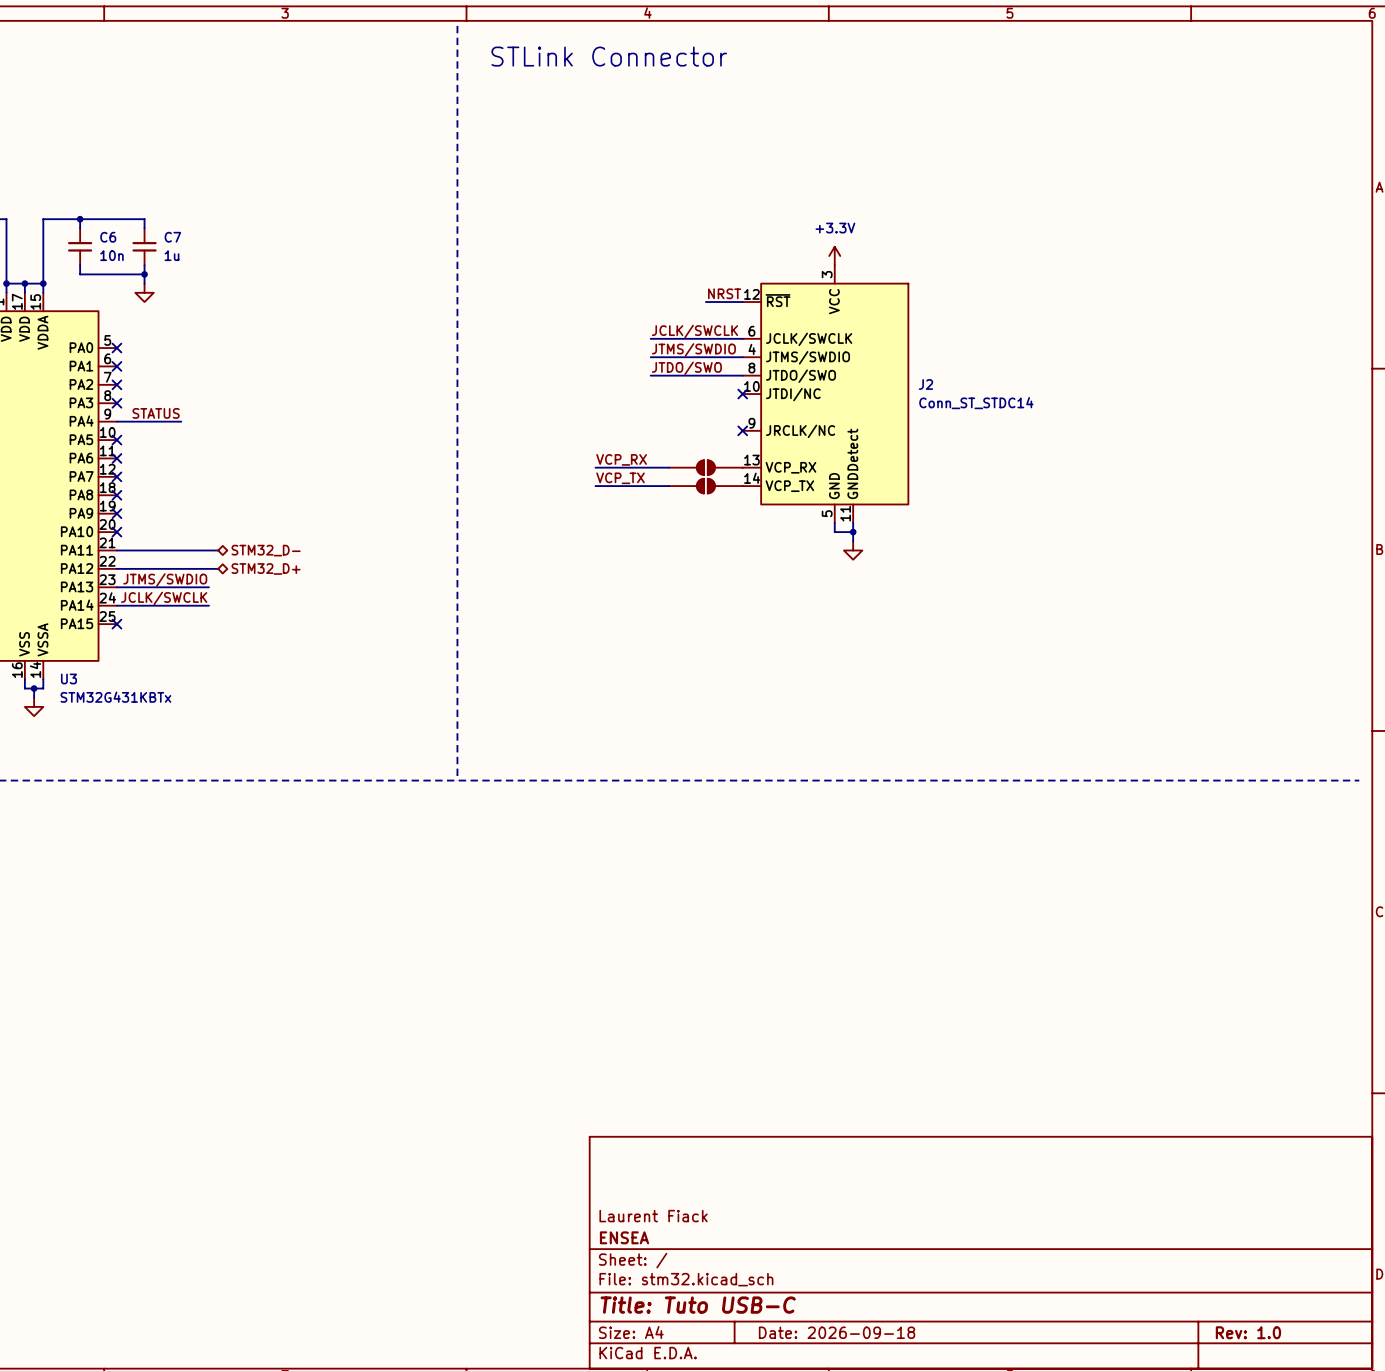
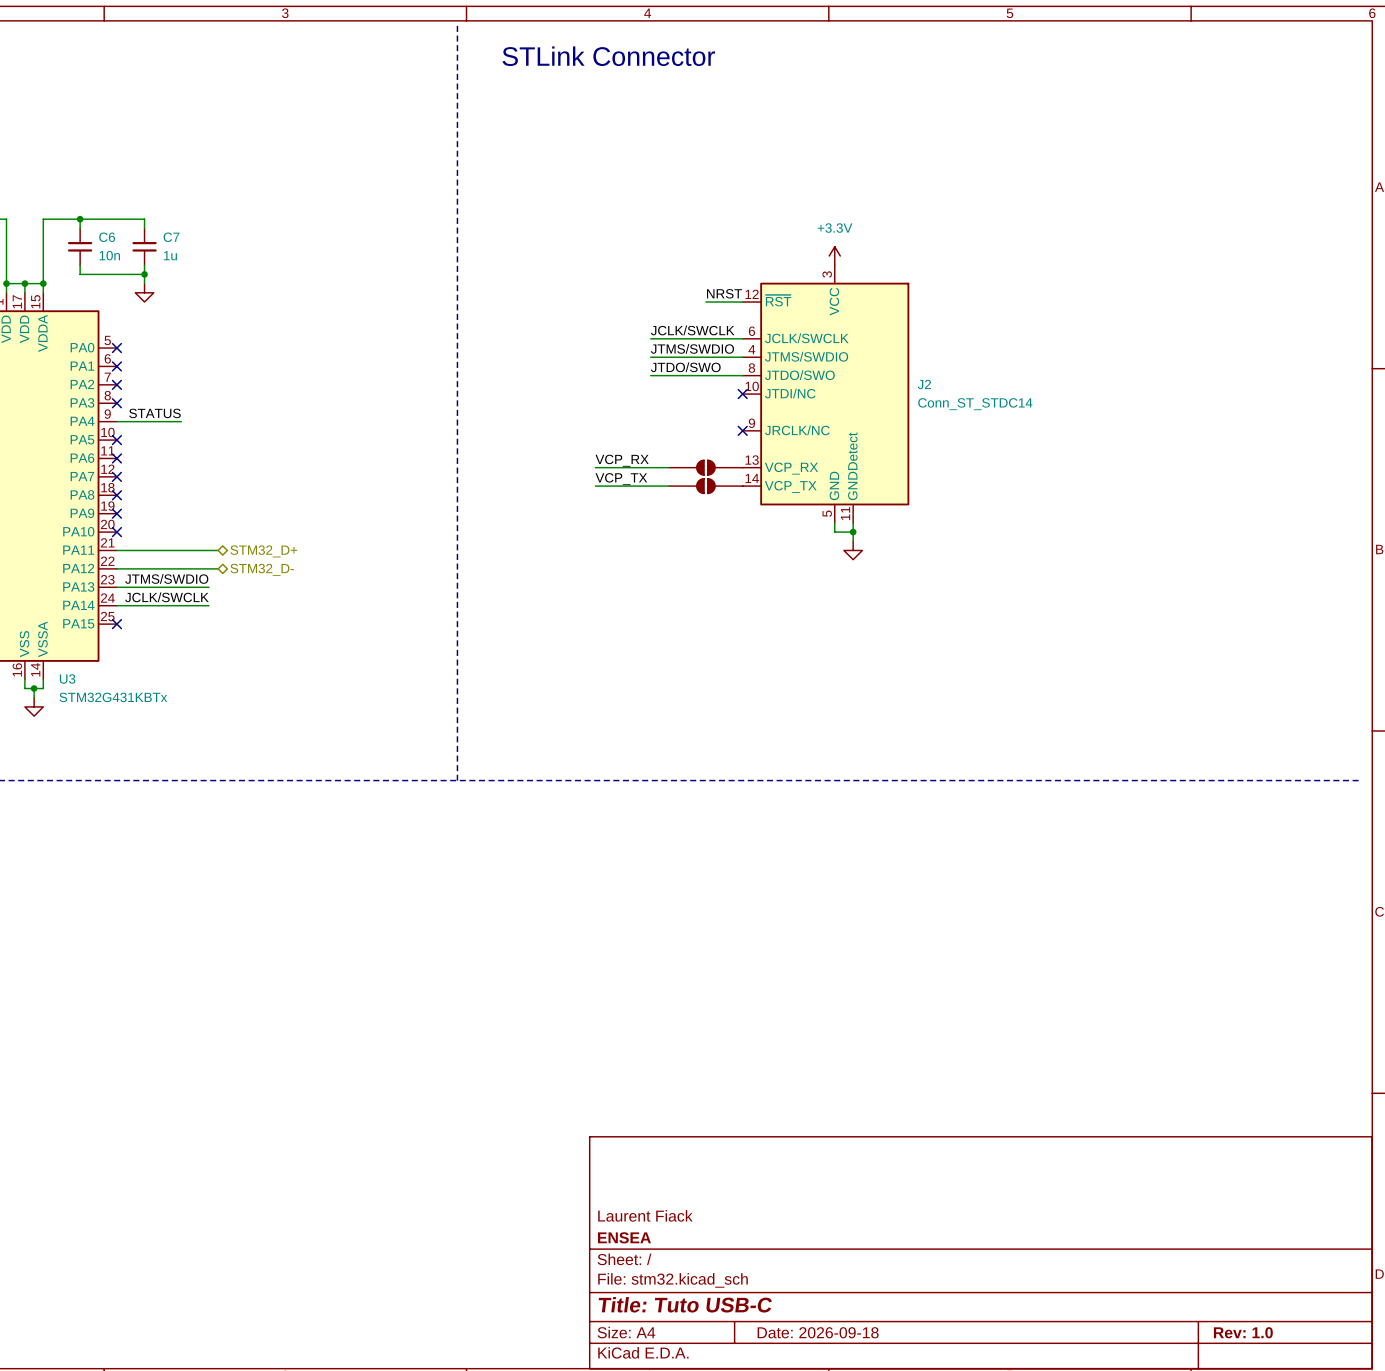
hierarchical label: STM32_D- (266, 550) -> STM32_D+ (263, 551)
hierarchical label: STM32_D+ (266, 568) -> STM32_D- (262, 569)

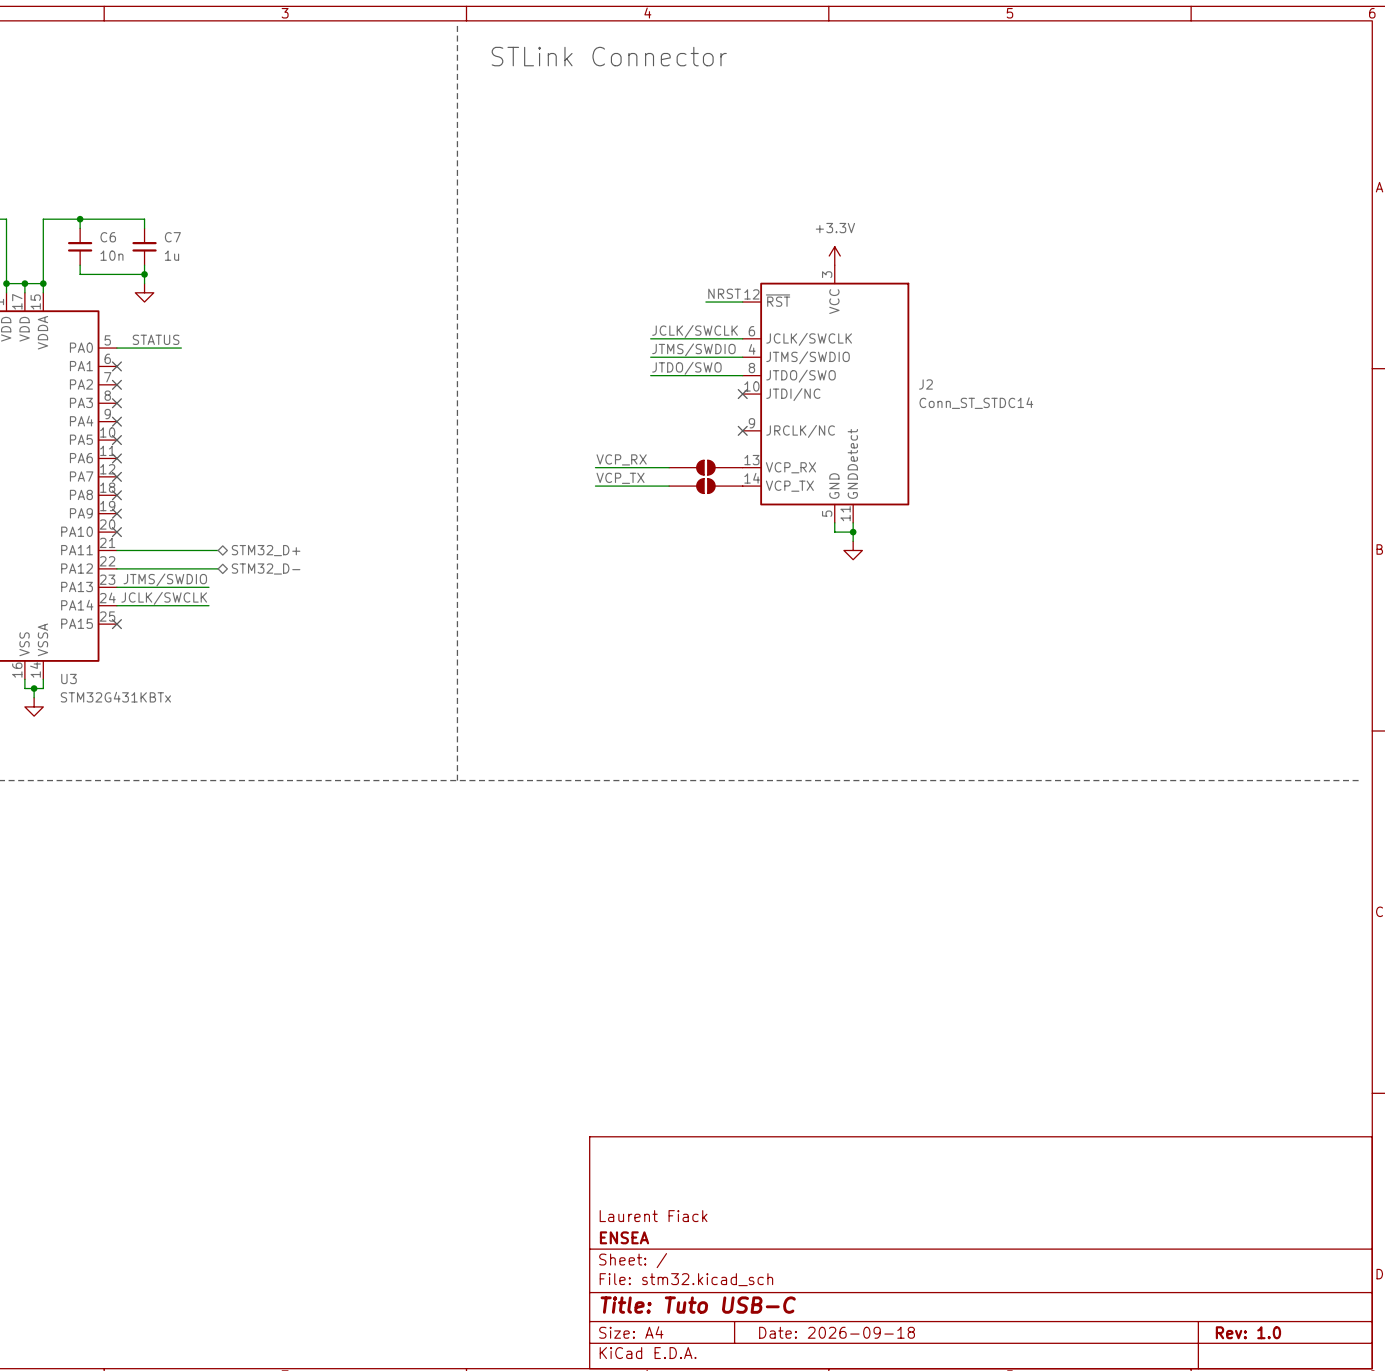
no-connect mark: (116, 348) -> none
label position: STATUS (154, 413) -> STATUS (156, 339)
wire: (116, 421) (181, 421) -> (116, 348) (181, 348)
no-connect mark: none -> (116, 421)

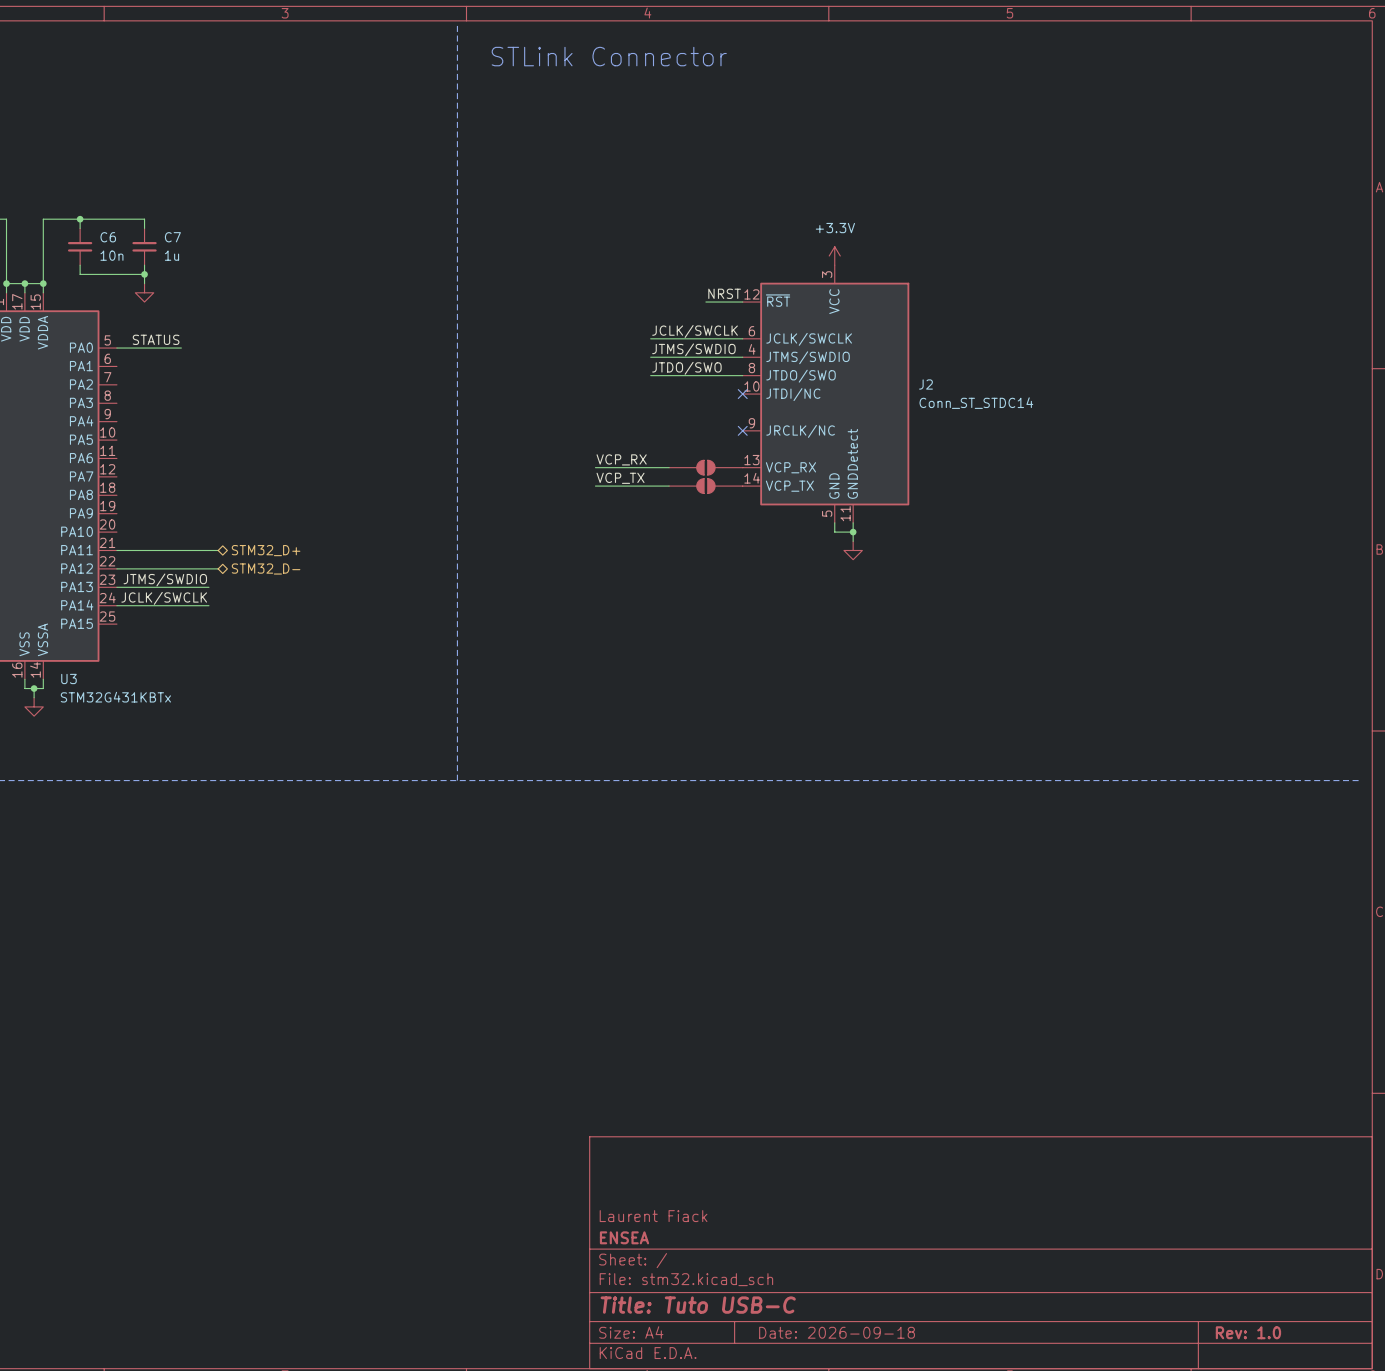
no-connect mark: (116, 366) -> none
no-connect mark: (116, 384) -> none
no-connect mark: (116, 403) -> none
no-connect mark: (116, 421) -> none
no-connect mark: (116, 440) -> none
no-connect mark: (116, 458) -> none
no-connect mark: (116, 476) -> none
no-connect mark: (116, 495) -> none
no-connect mark: (116, 513) -> none
no-connect mark: (116, 532) -> none
no-connect mark: (116, 624) -> none

